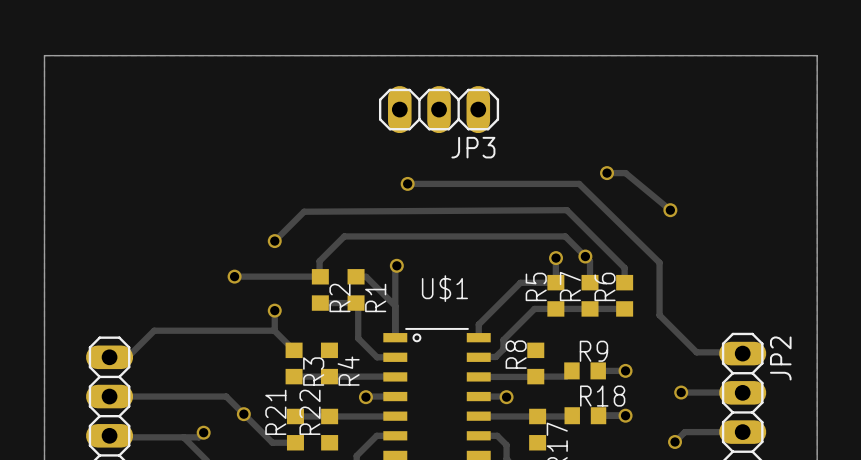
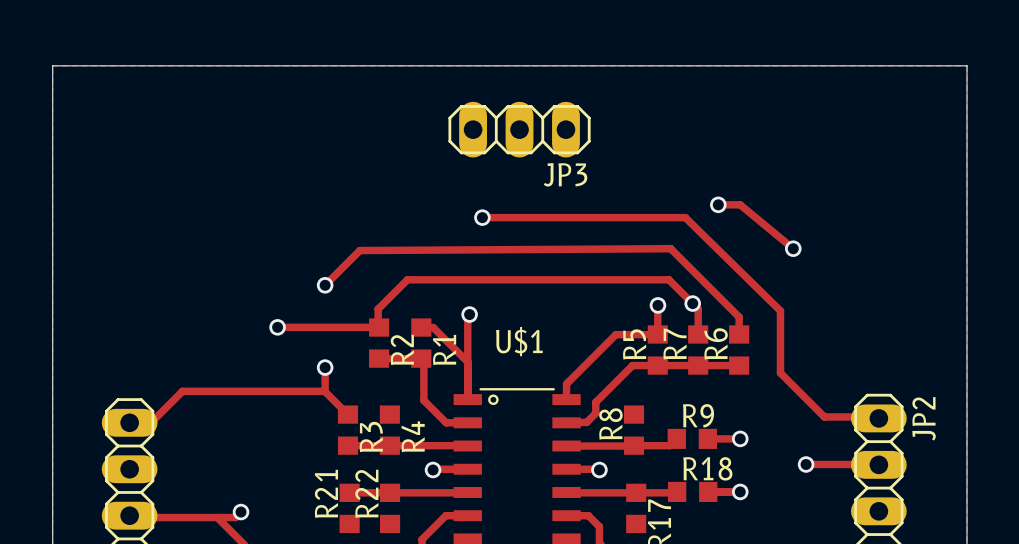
track: (109, 396) (226, 396) (272, 442) (295, 442) -> none
via: (243, 414) -> none
track: (742, 432) (684, 432) (675, 441) -> none
via: (675, 441) -> none

